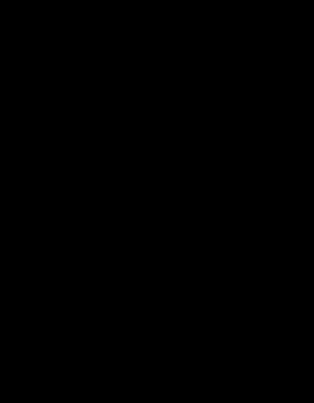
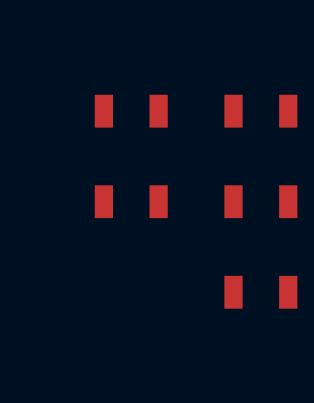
part: none -> (131, 111)
part: none -> (260, 111)
part: none -> (131, 201)
part: none -> (260, 201)
part: none -> (260, 292)

